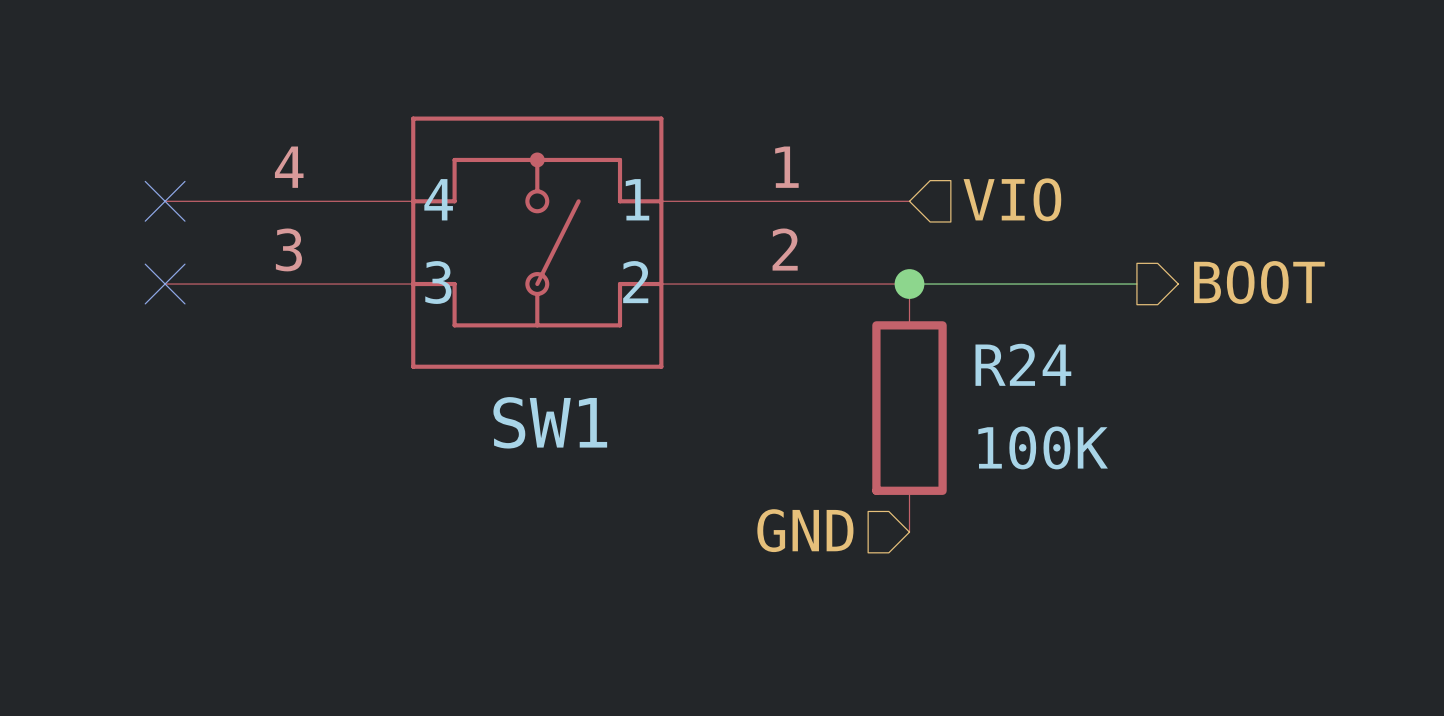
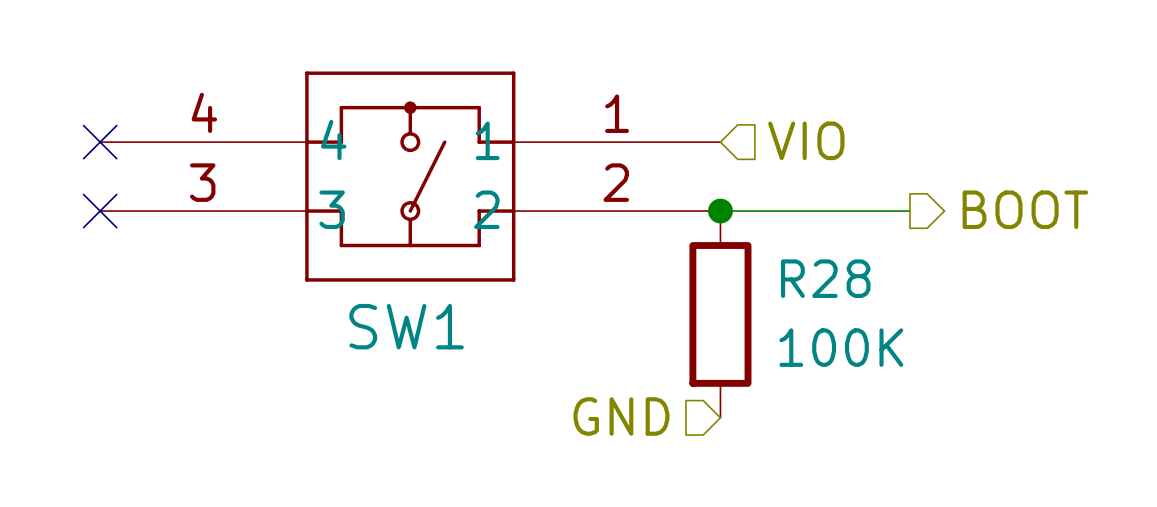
R24 name: R24 (1023, 364) -> R28 (825, 278)

